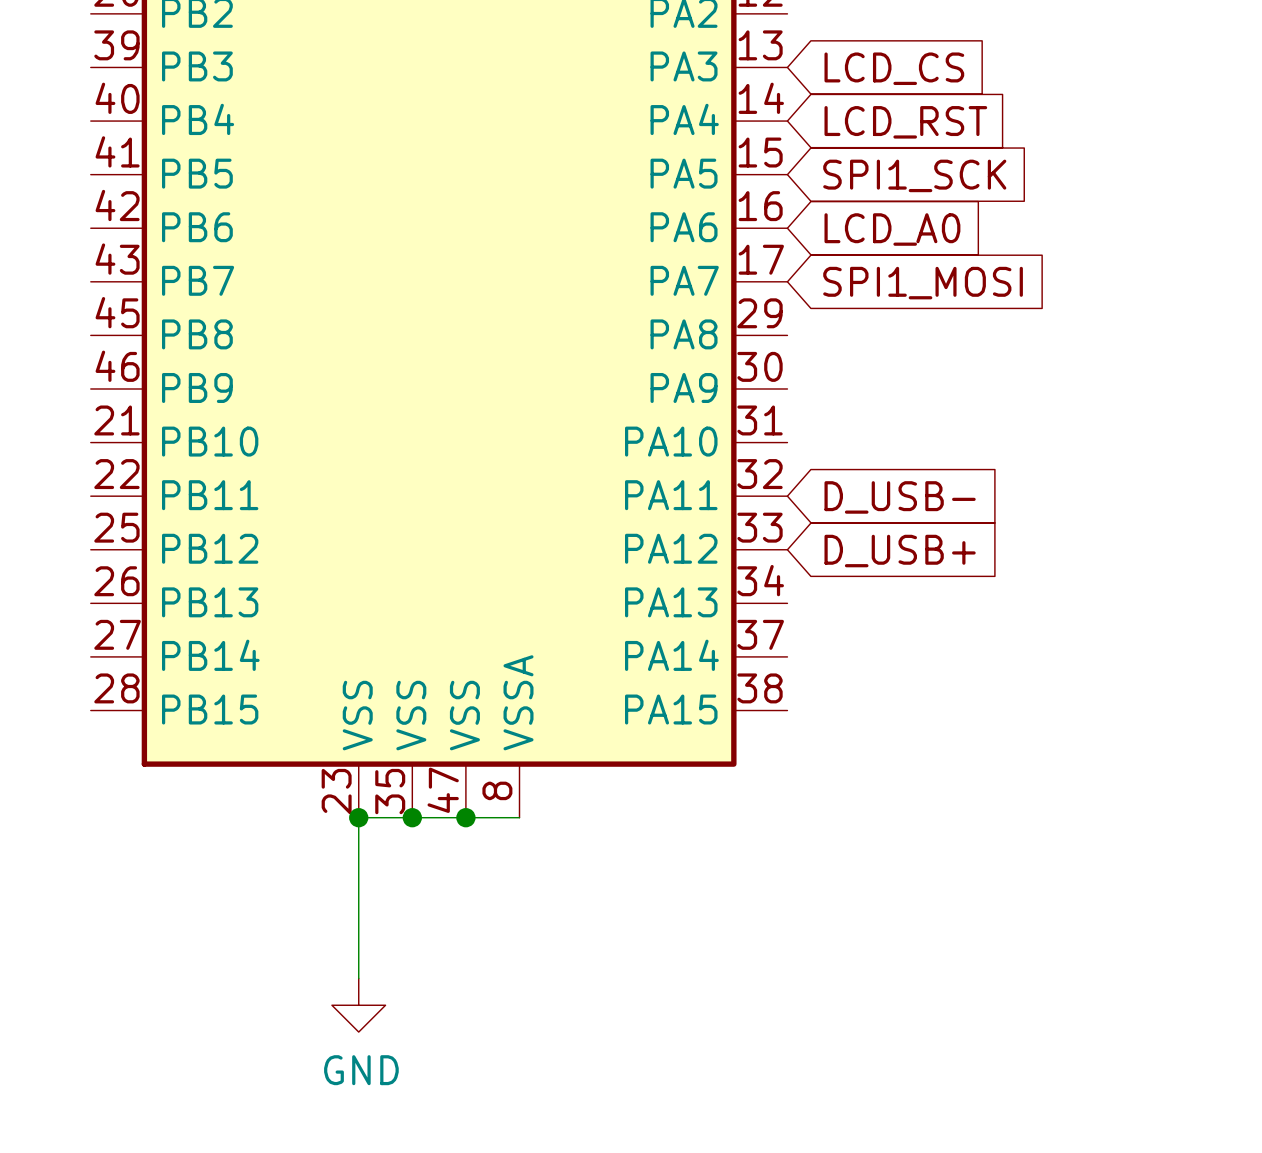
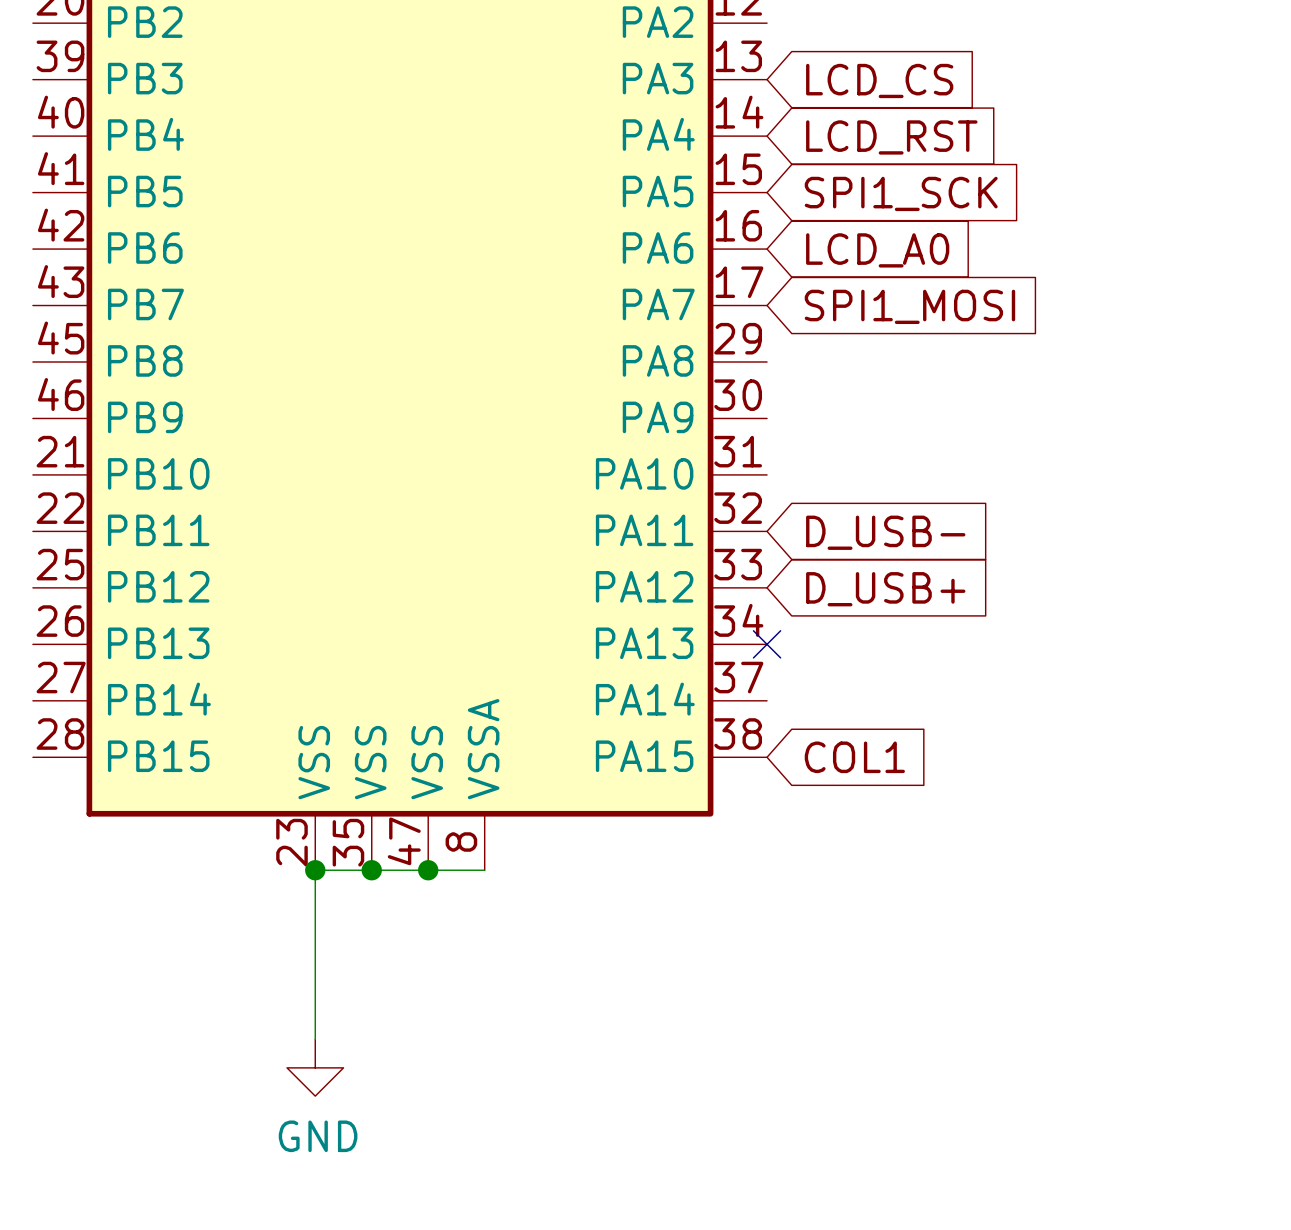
no-connect mark: none -> (767, 644)
global label: none -> COL1 (854, 757)

